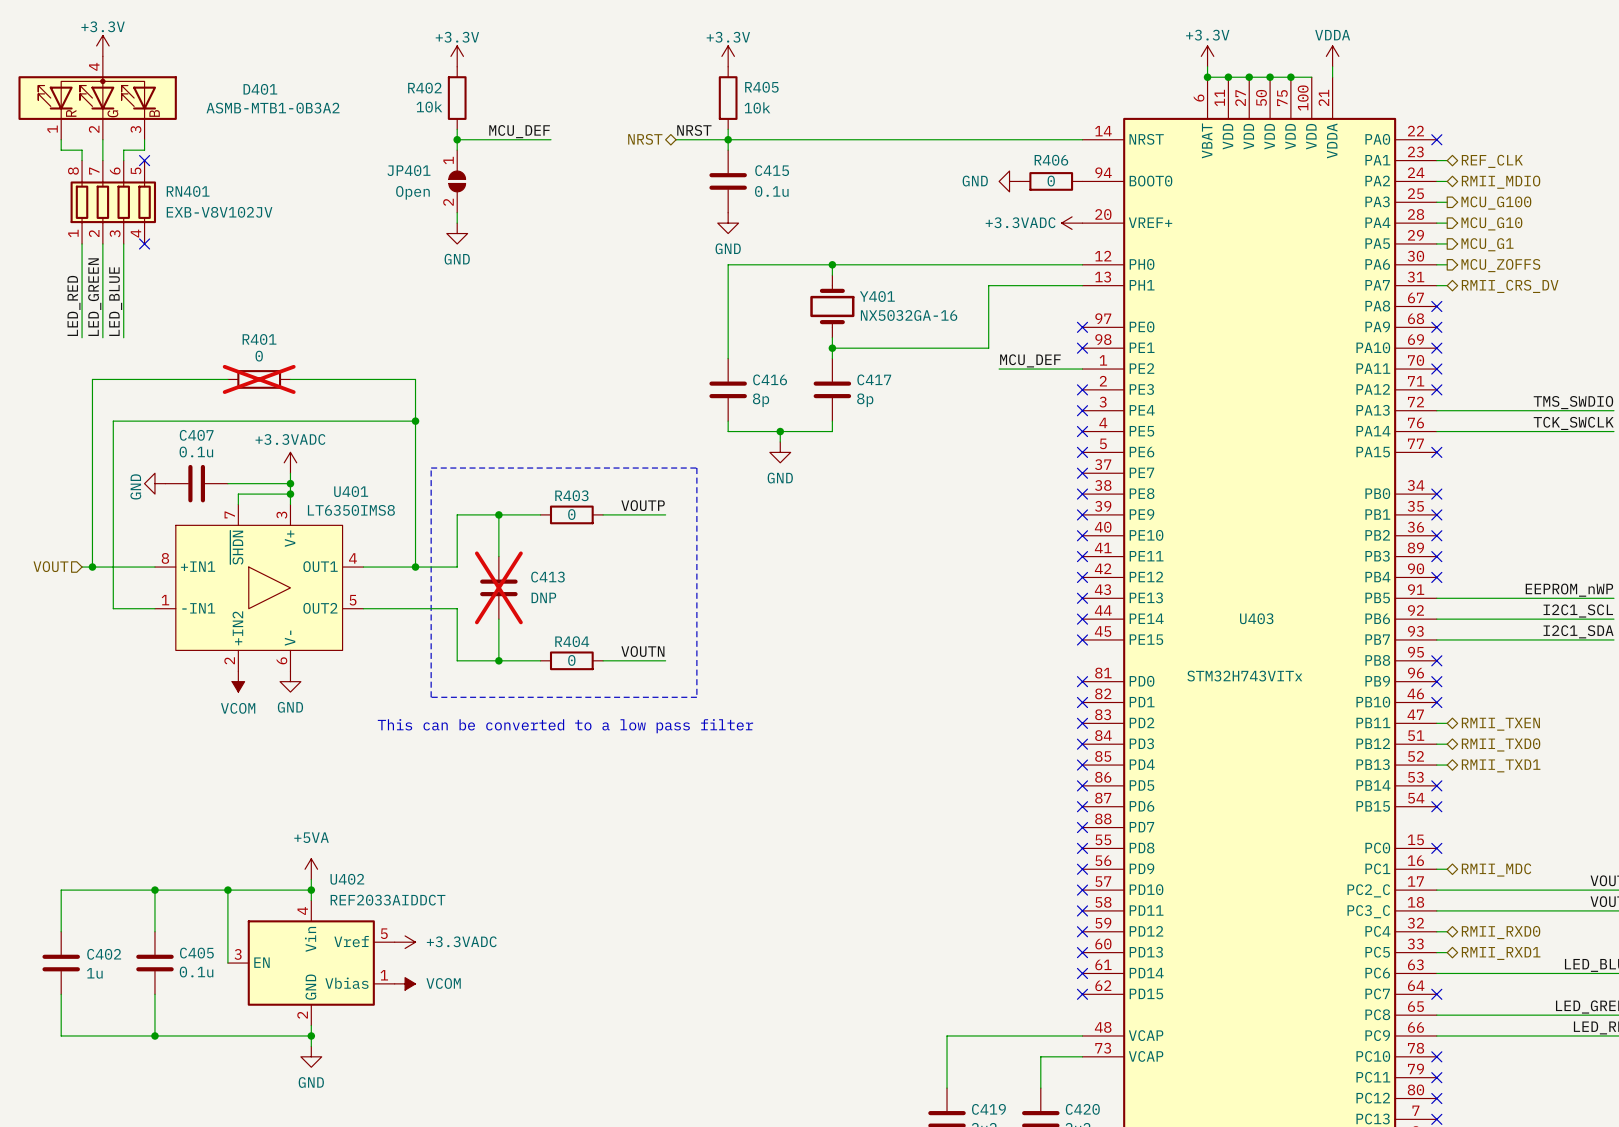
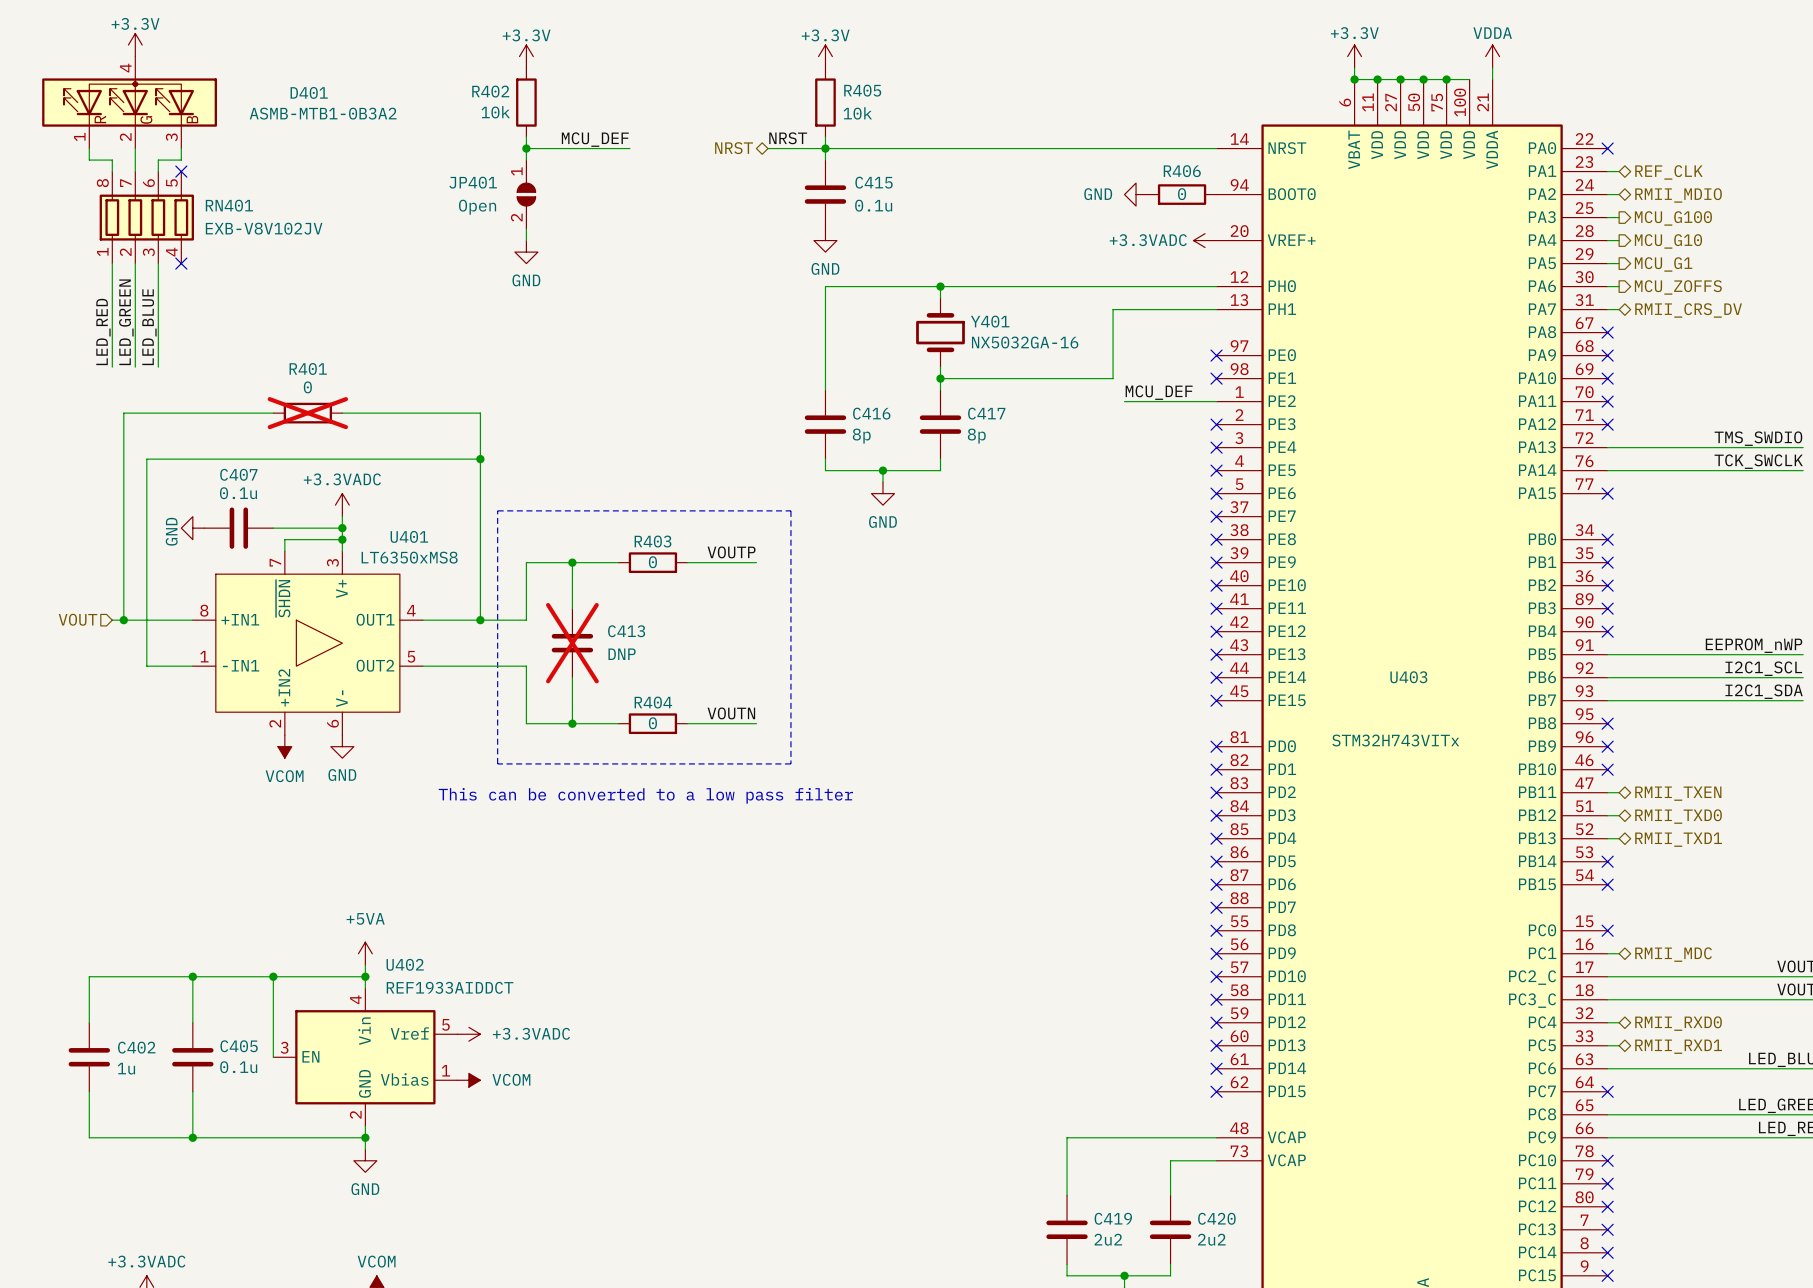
U401 value: LT6350IMS8 (351, 510) -> LT6350xMS8 (409, 557)
U402 value: REF2033AIDDCT (388, 900) -> REF1933AIDDCT (450, 987)

